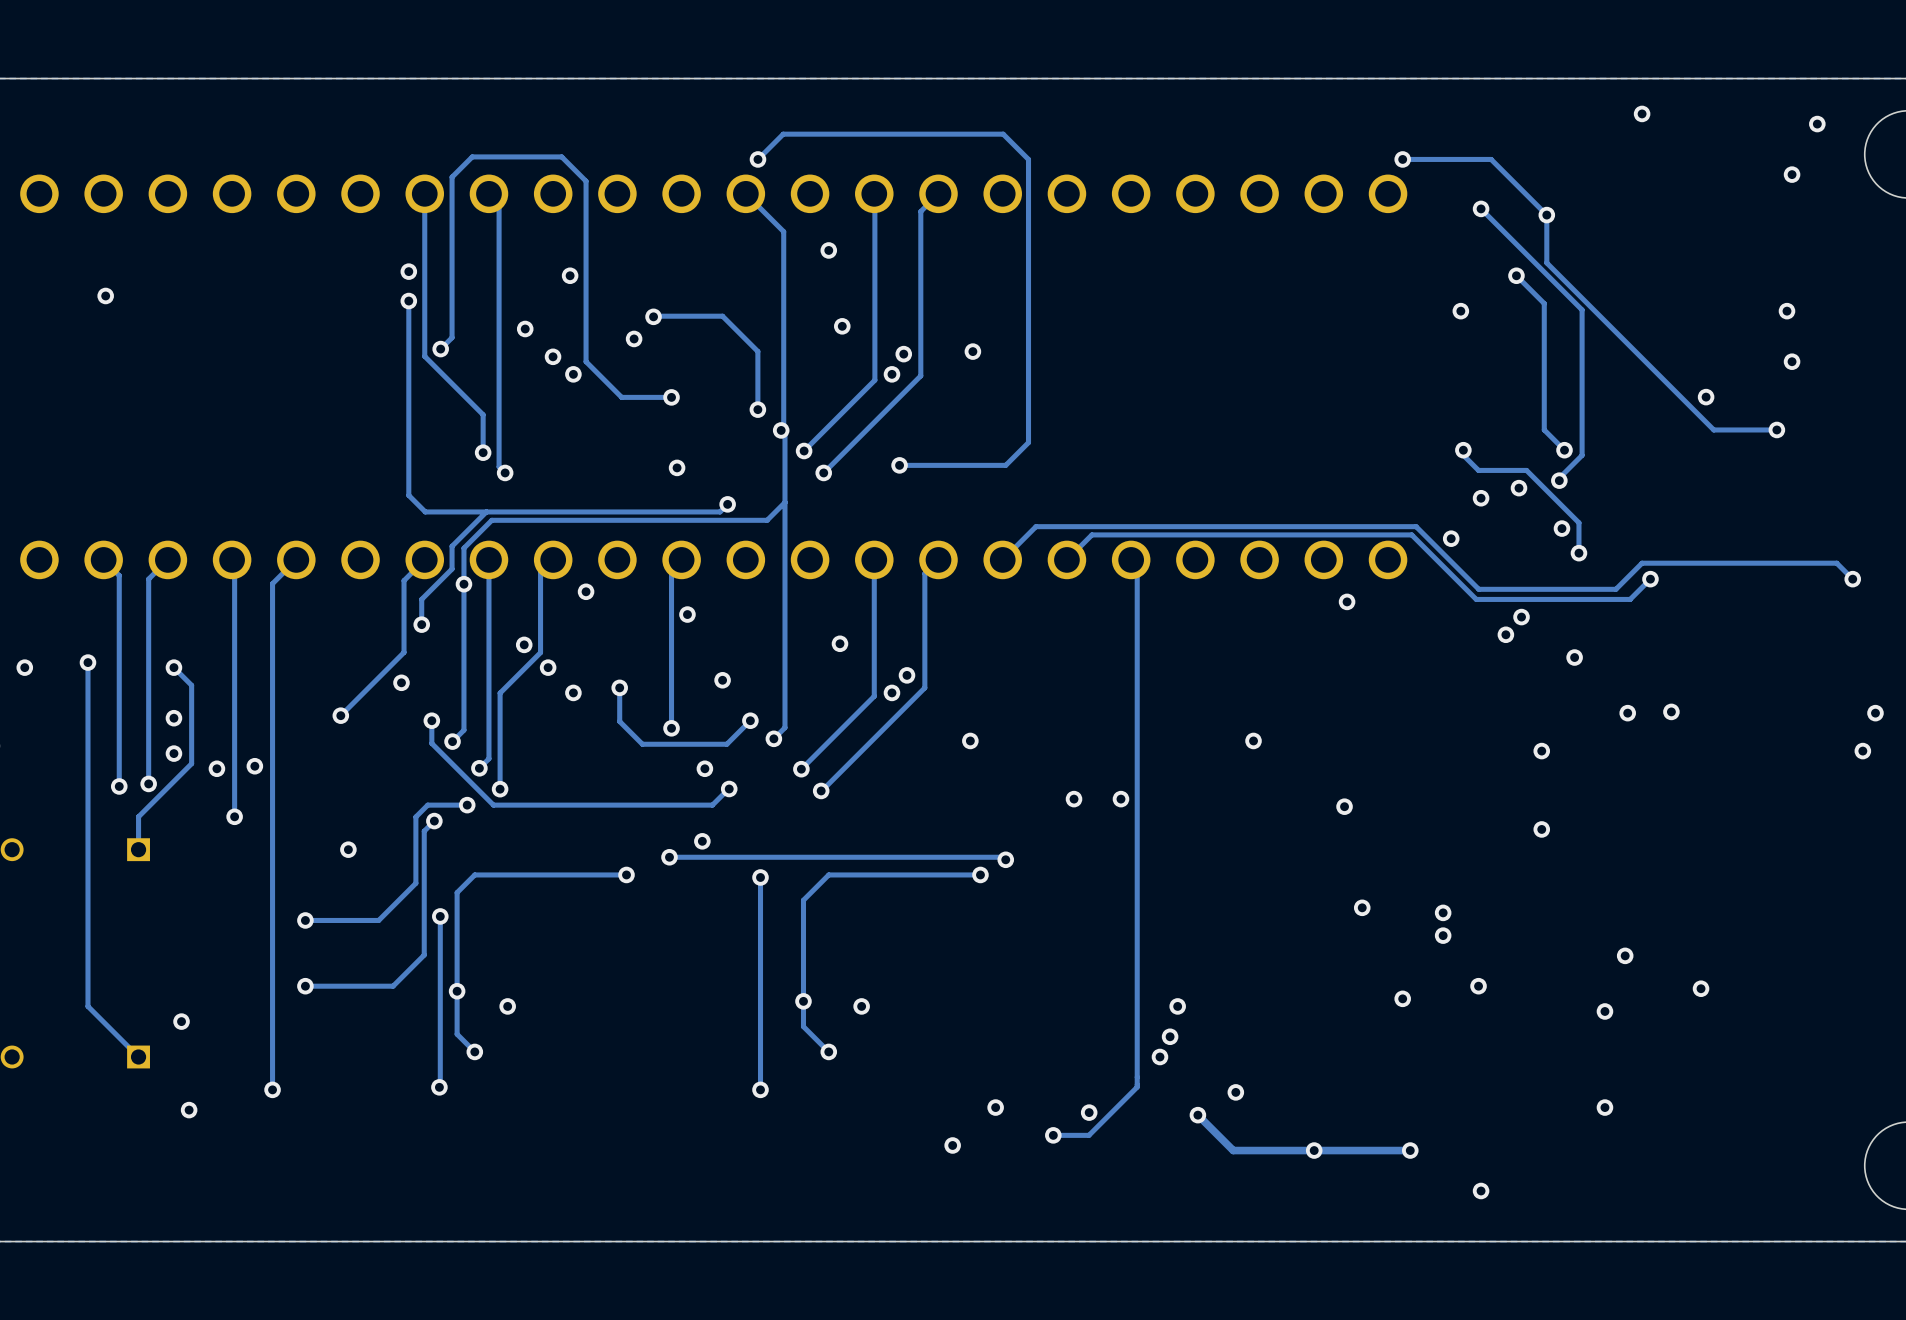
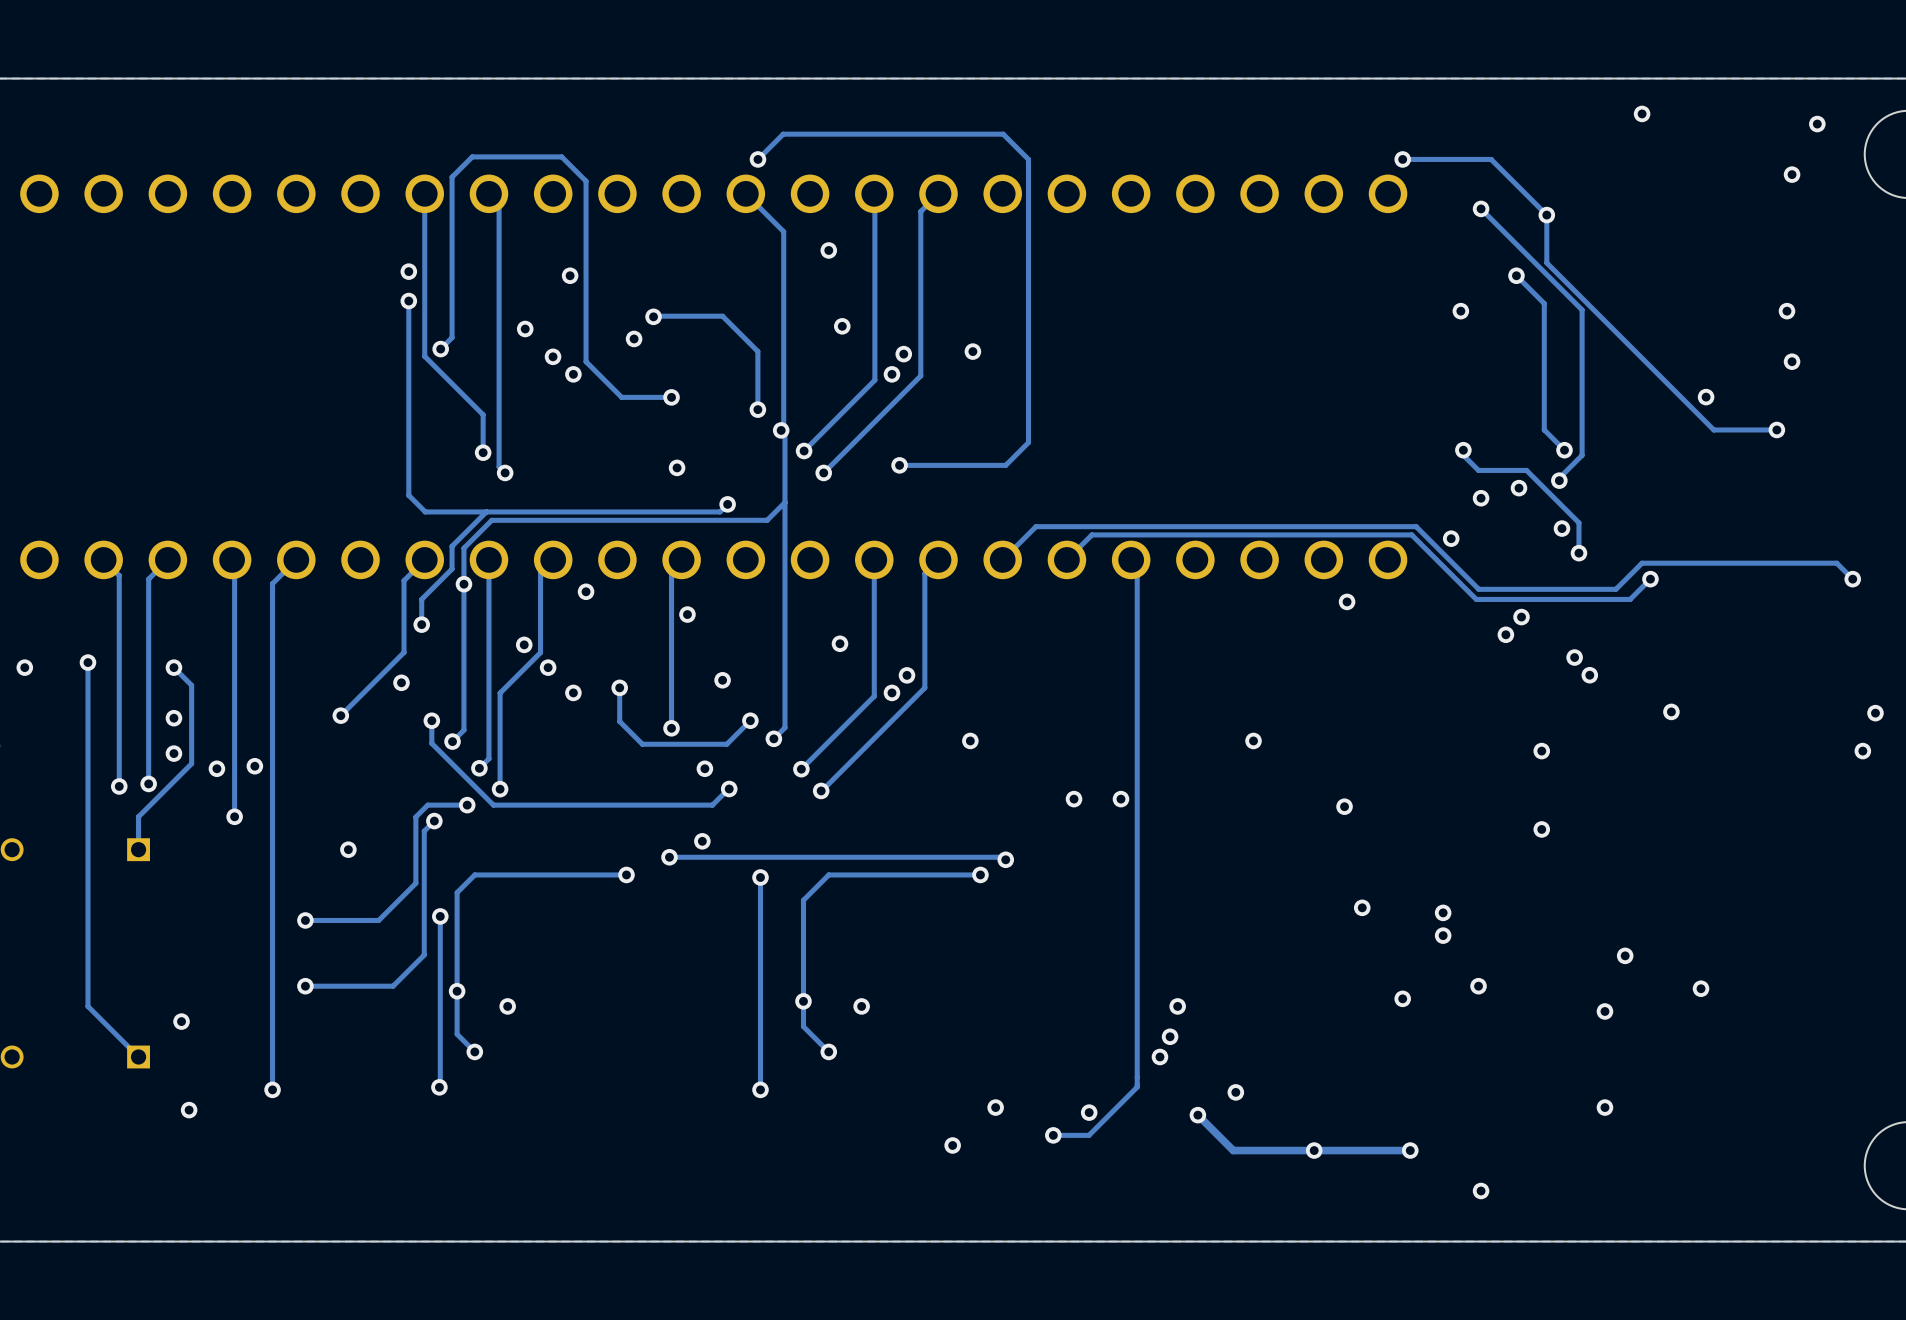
via: (105, 295) -> none
via position: (1627, 713) -> (1589, 675)

